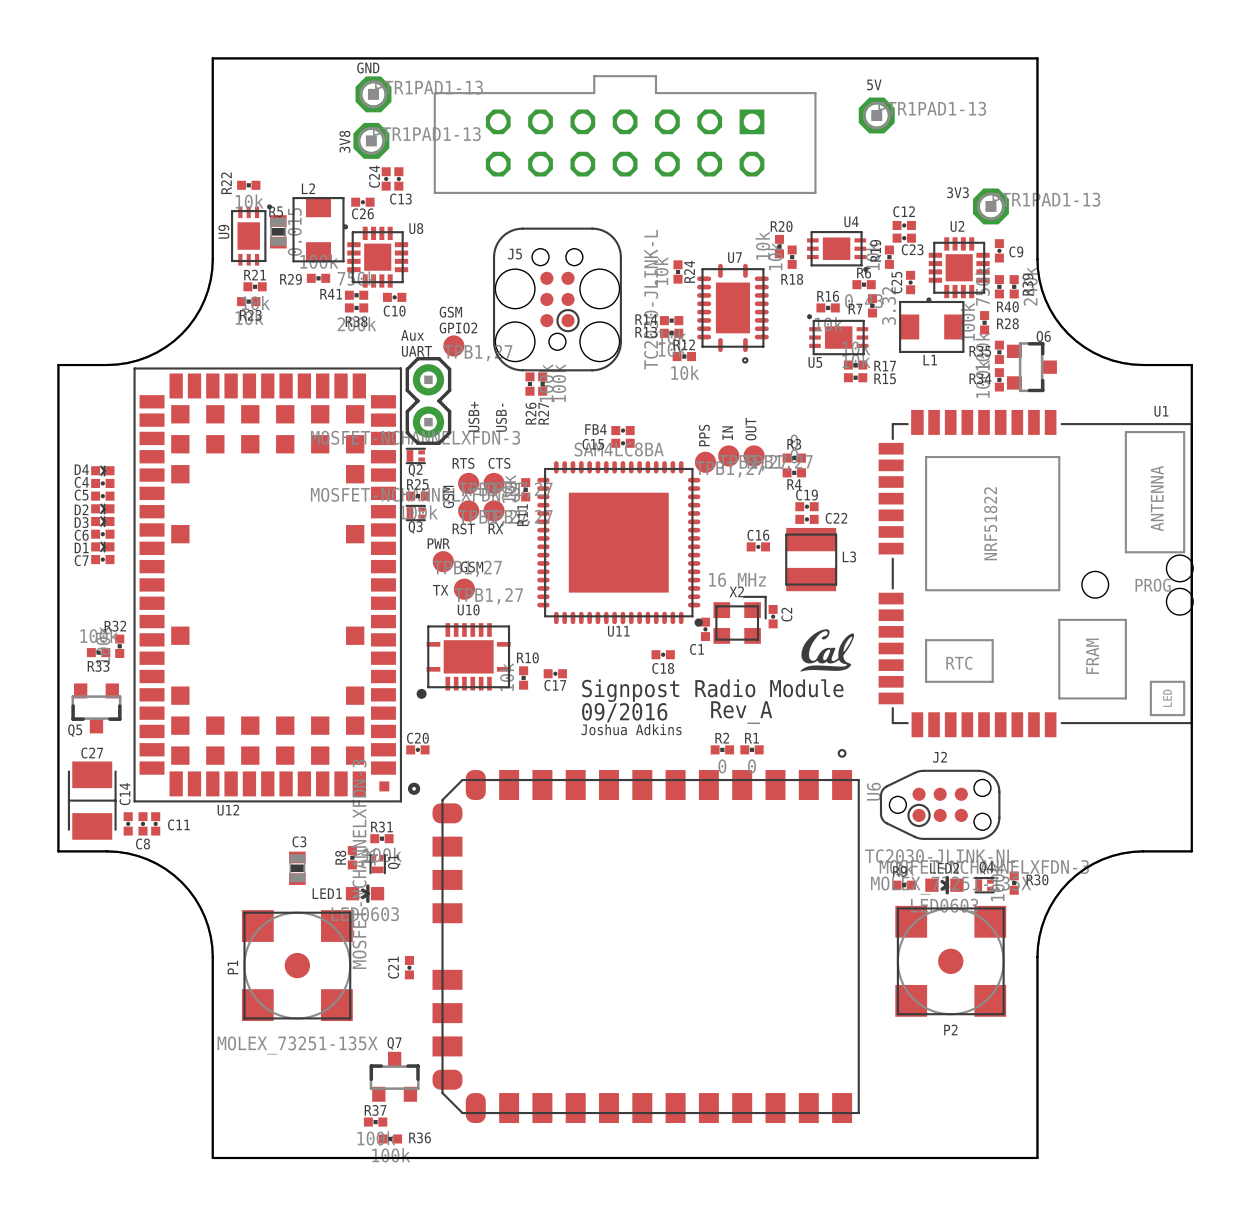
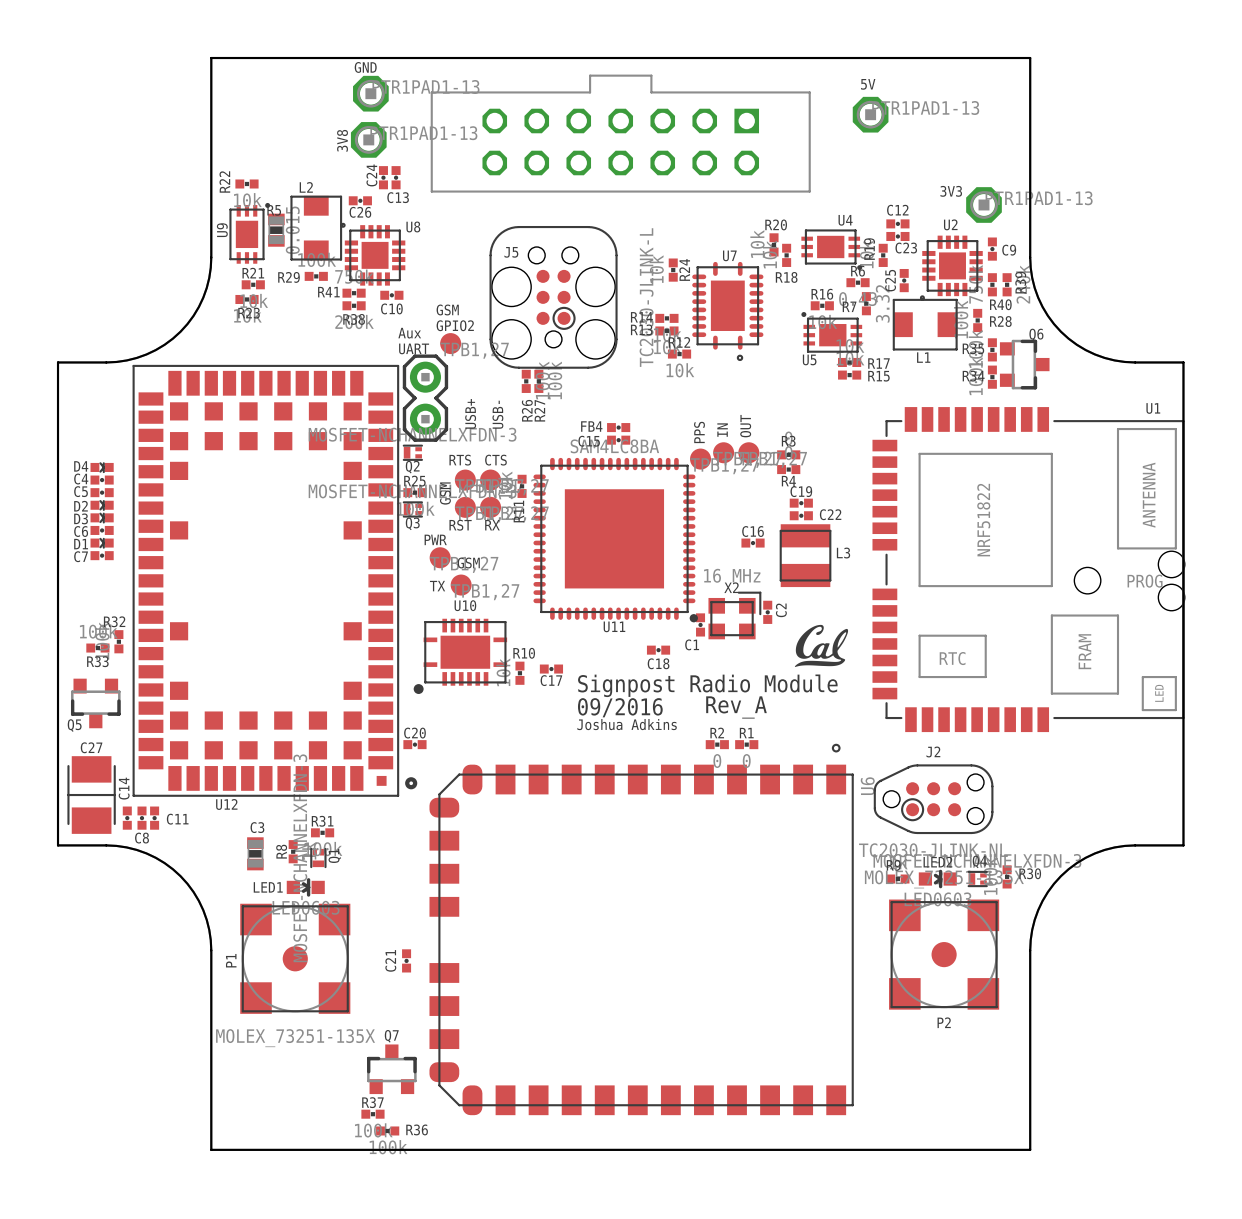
R31 position: (381, 838) -> (322, 832)
R8 position: (352, 857) -> (293, 851)
Q1 position: (377, 864) -> (318, 858)
C3 position: (297, 868) -> (255, 853)
LED1 position: (365, 893) -> (305, 887)

